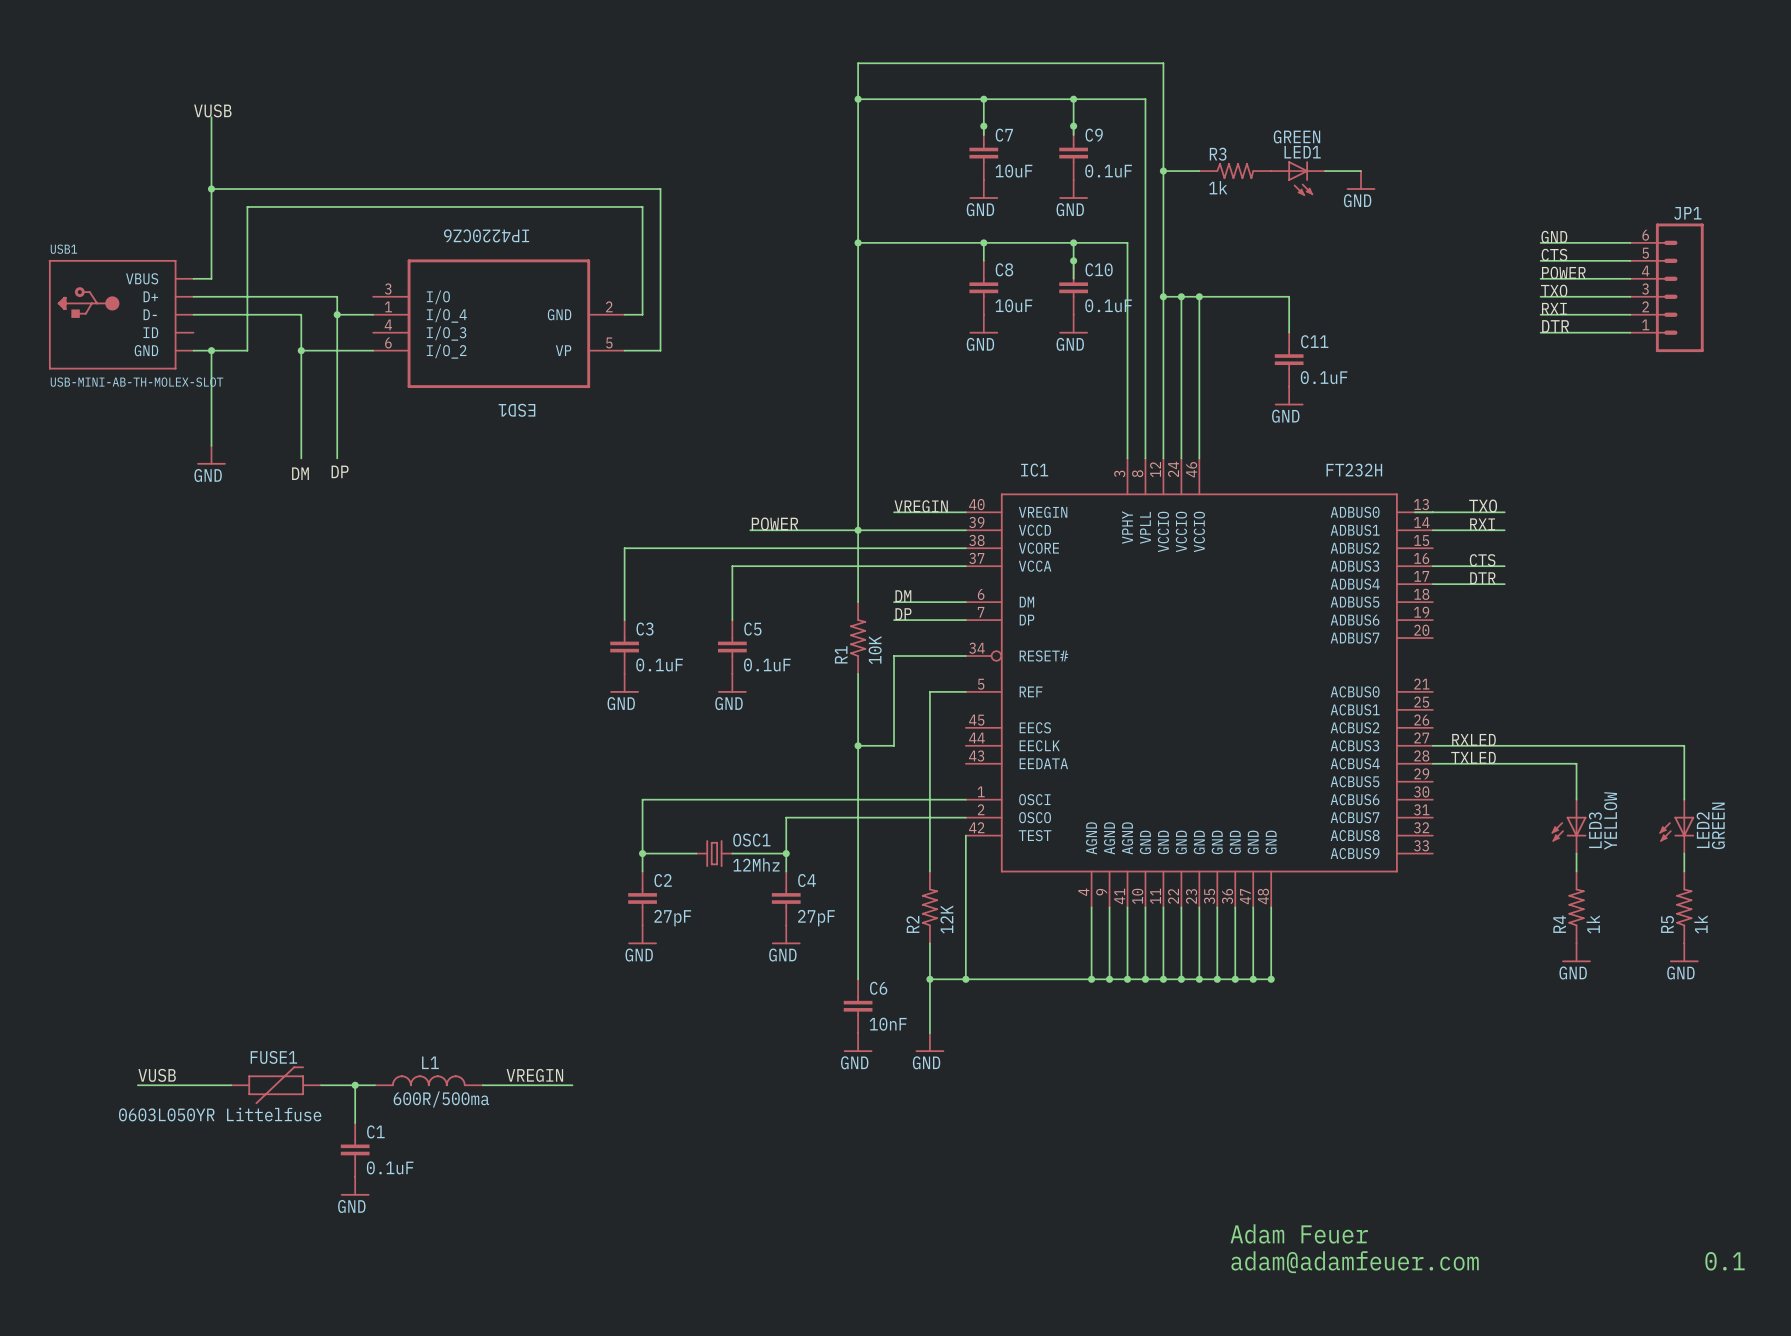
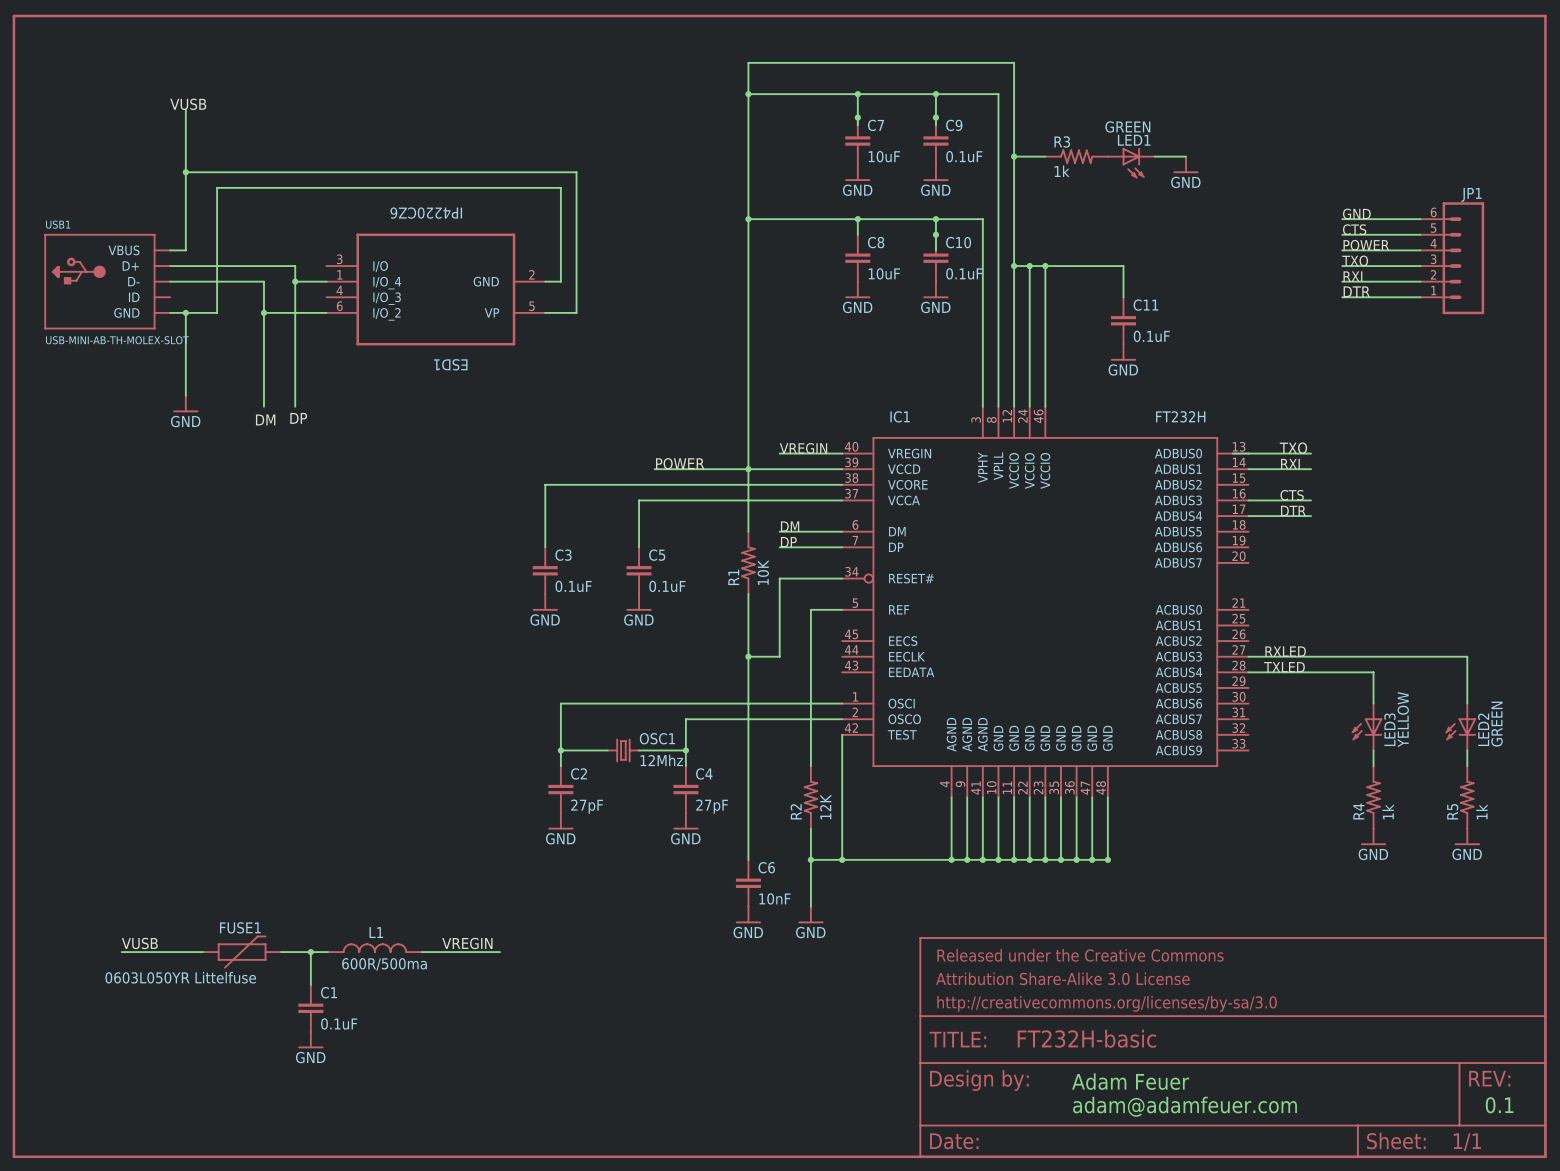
part: none -> (779, 586)
part: none -> (1232, 1047)

